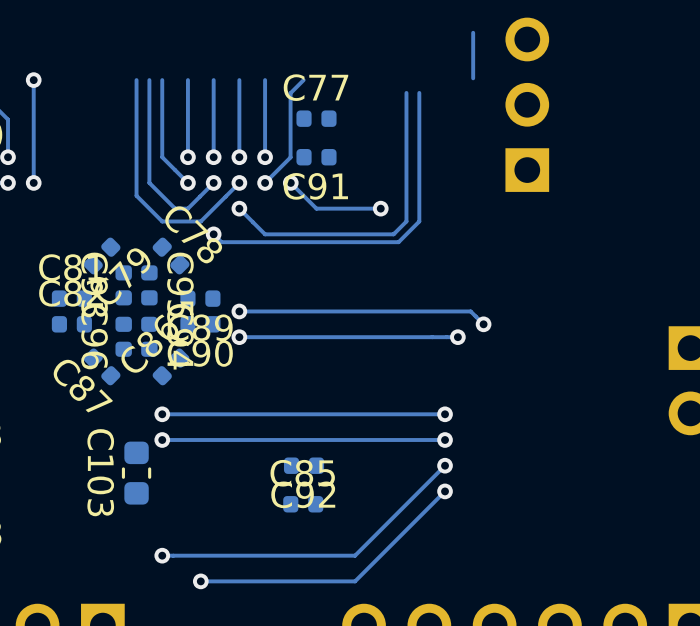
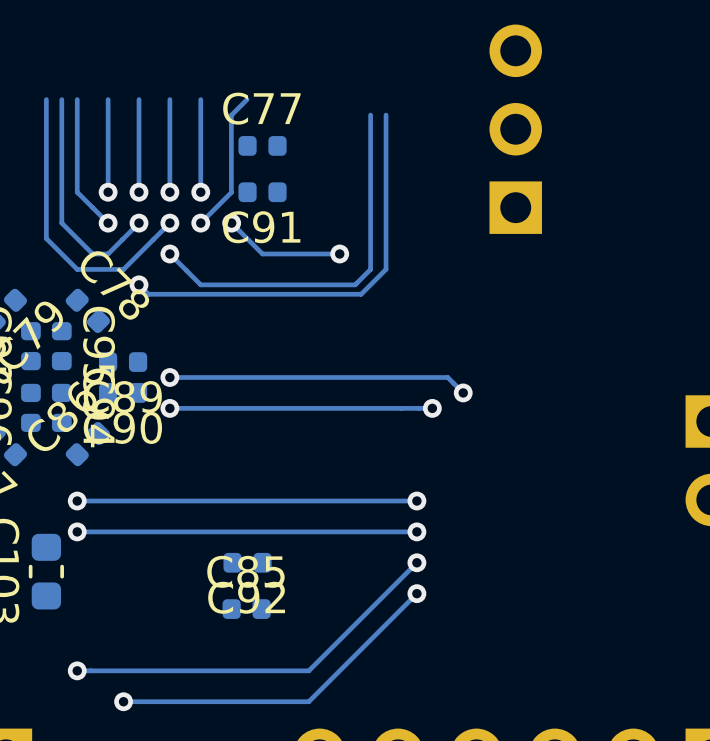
track: (473, 32) (473, 78) -> none

